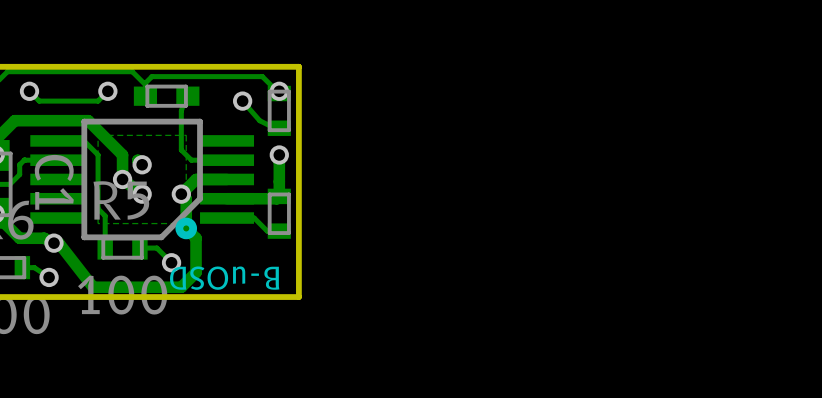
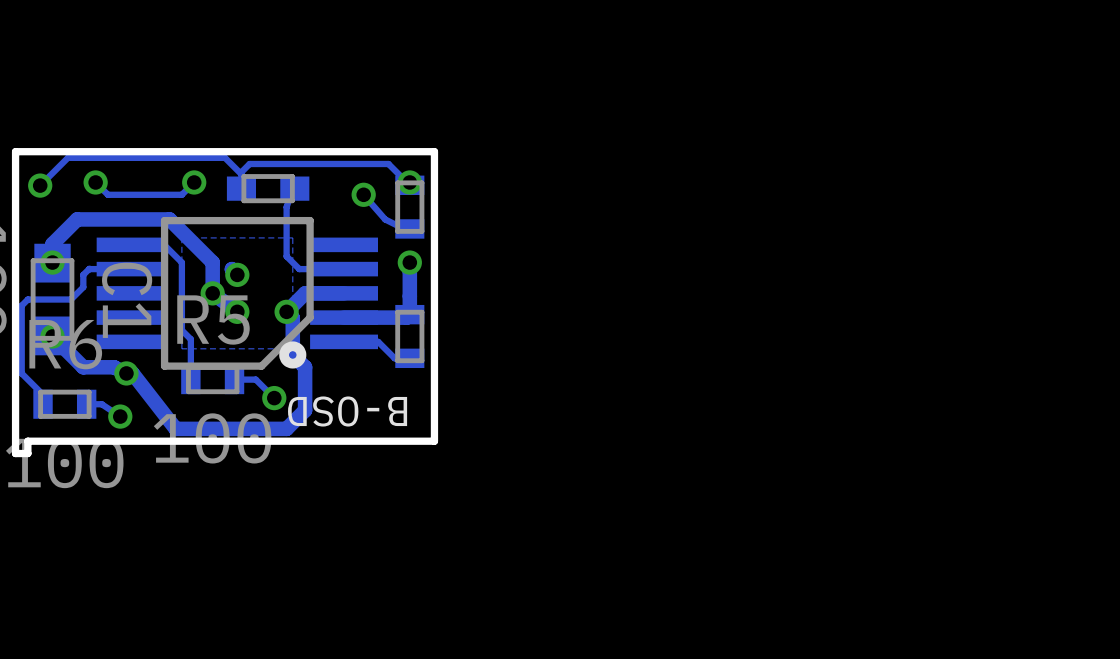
text: B-uOSD (224, 278) -> B-OSD (347, 411)

